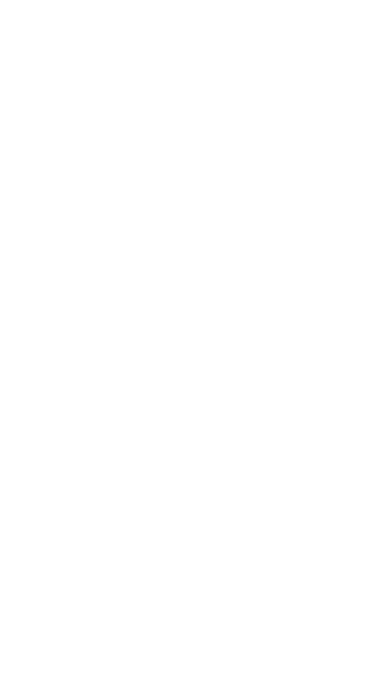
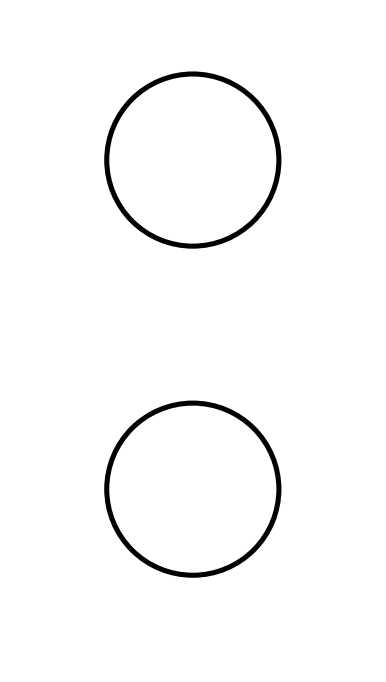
round board edge: none -> [104, 71, 282, 249]
round board edge: none -> [104, 400, 282, 578]

